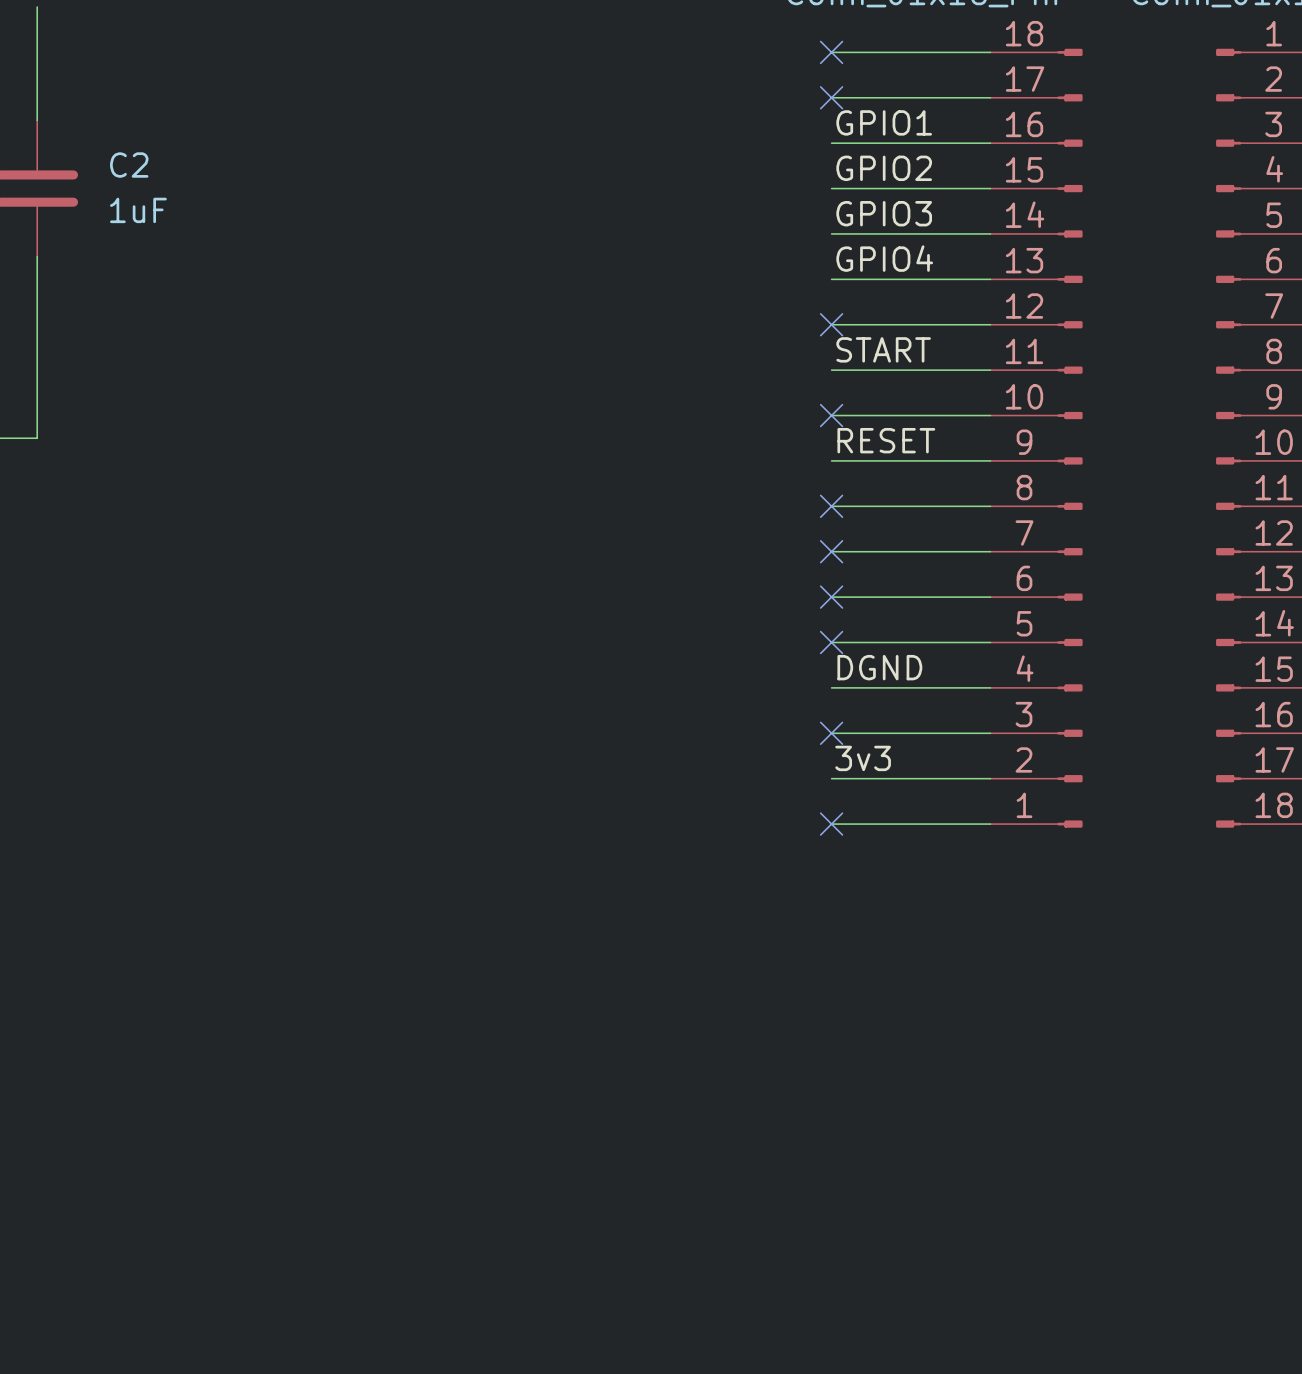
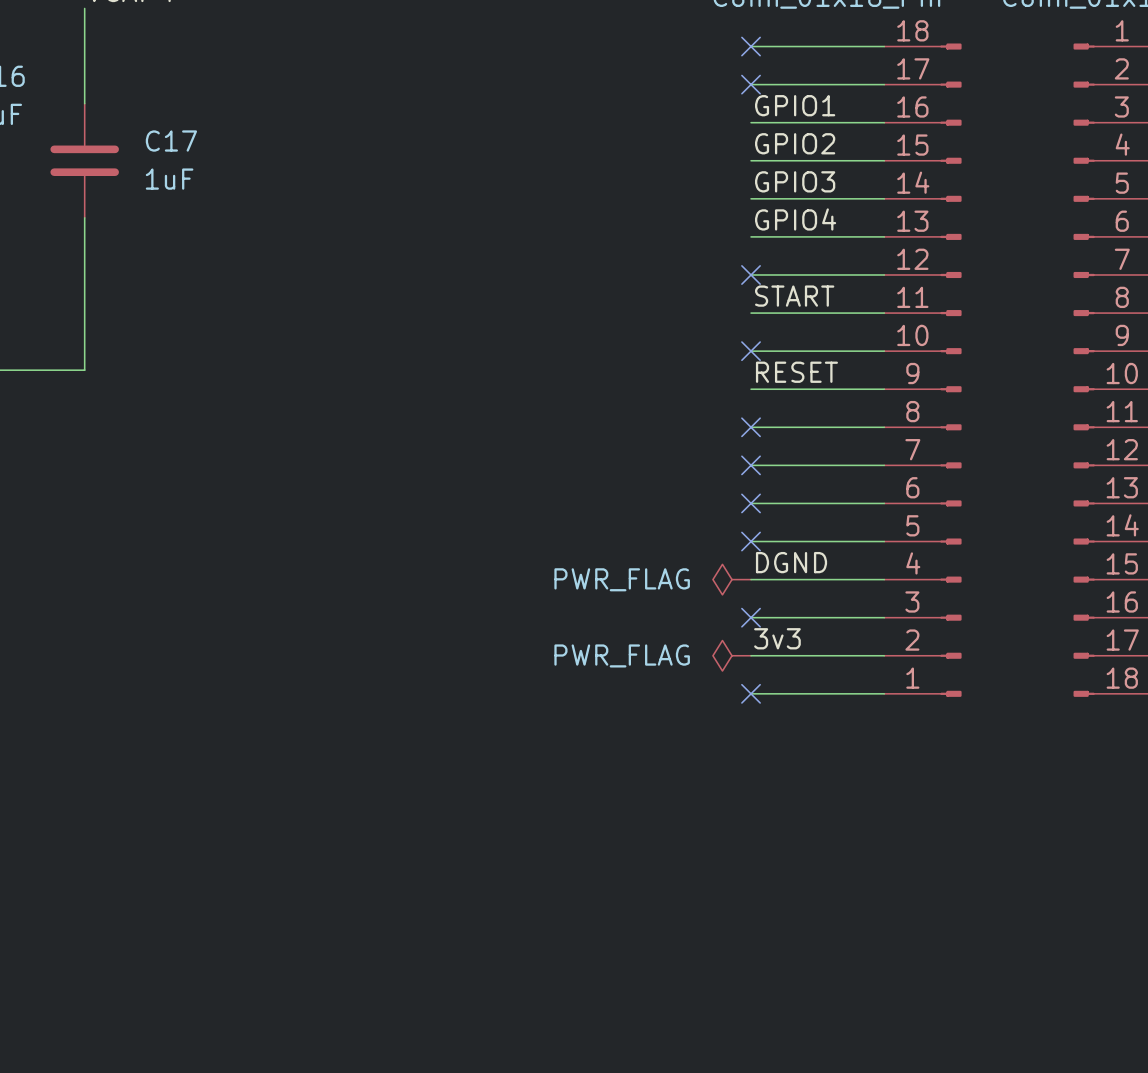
C2 name: C2 (129, 165) -> C17 (171, 141)
power symbol: none -> PWR_FLAG (731, 579)
power symbol: none -> PWR_FLAG (731, 655)

